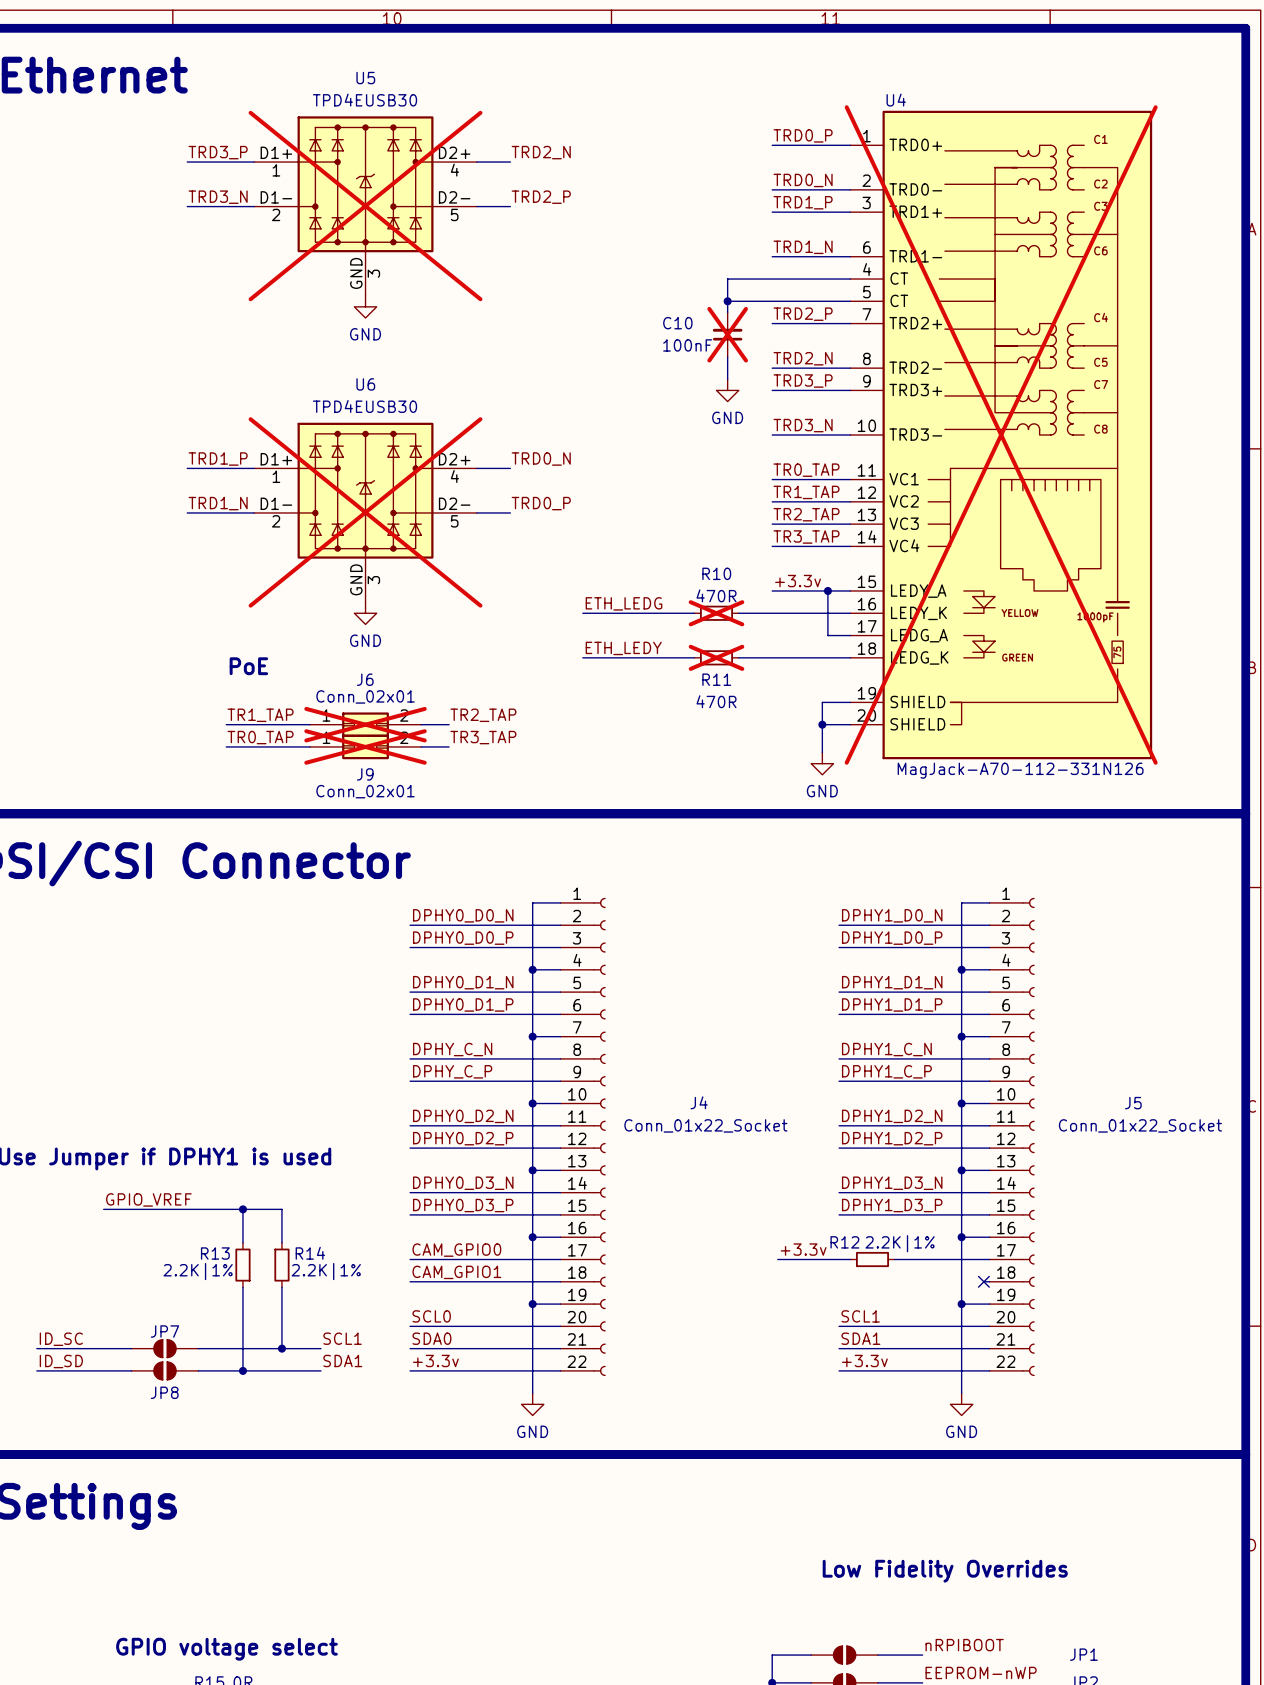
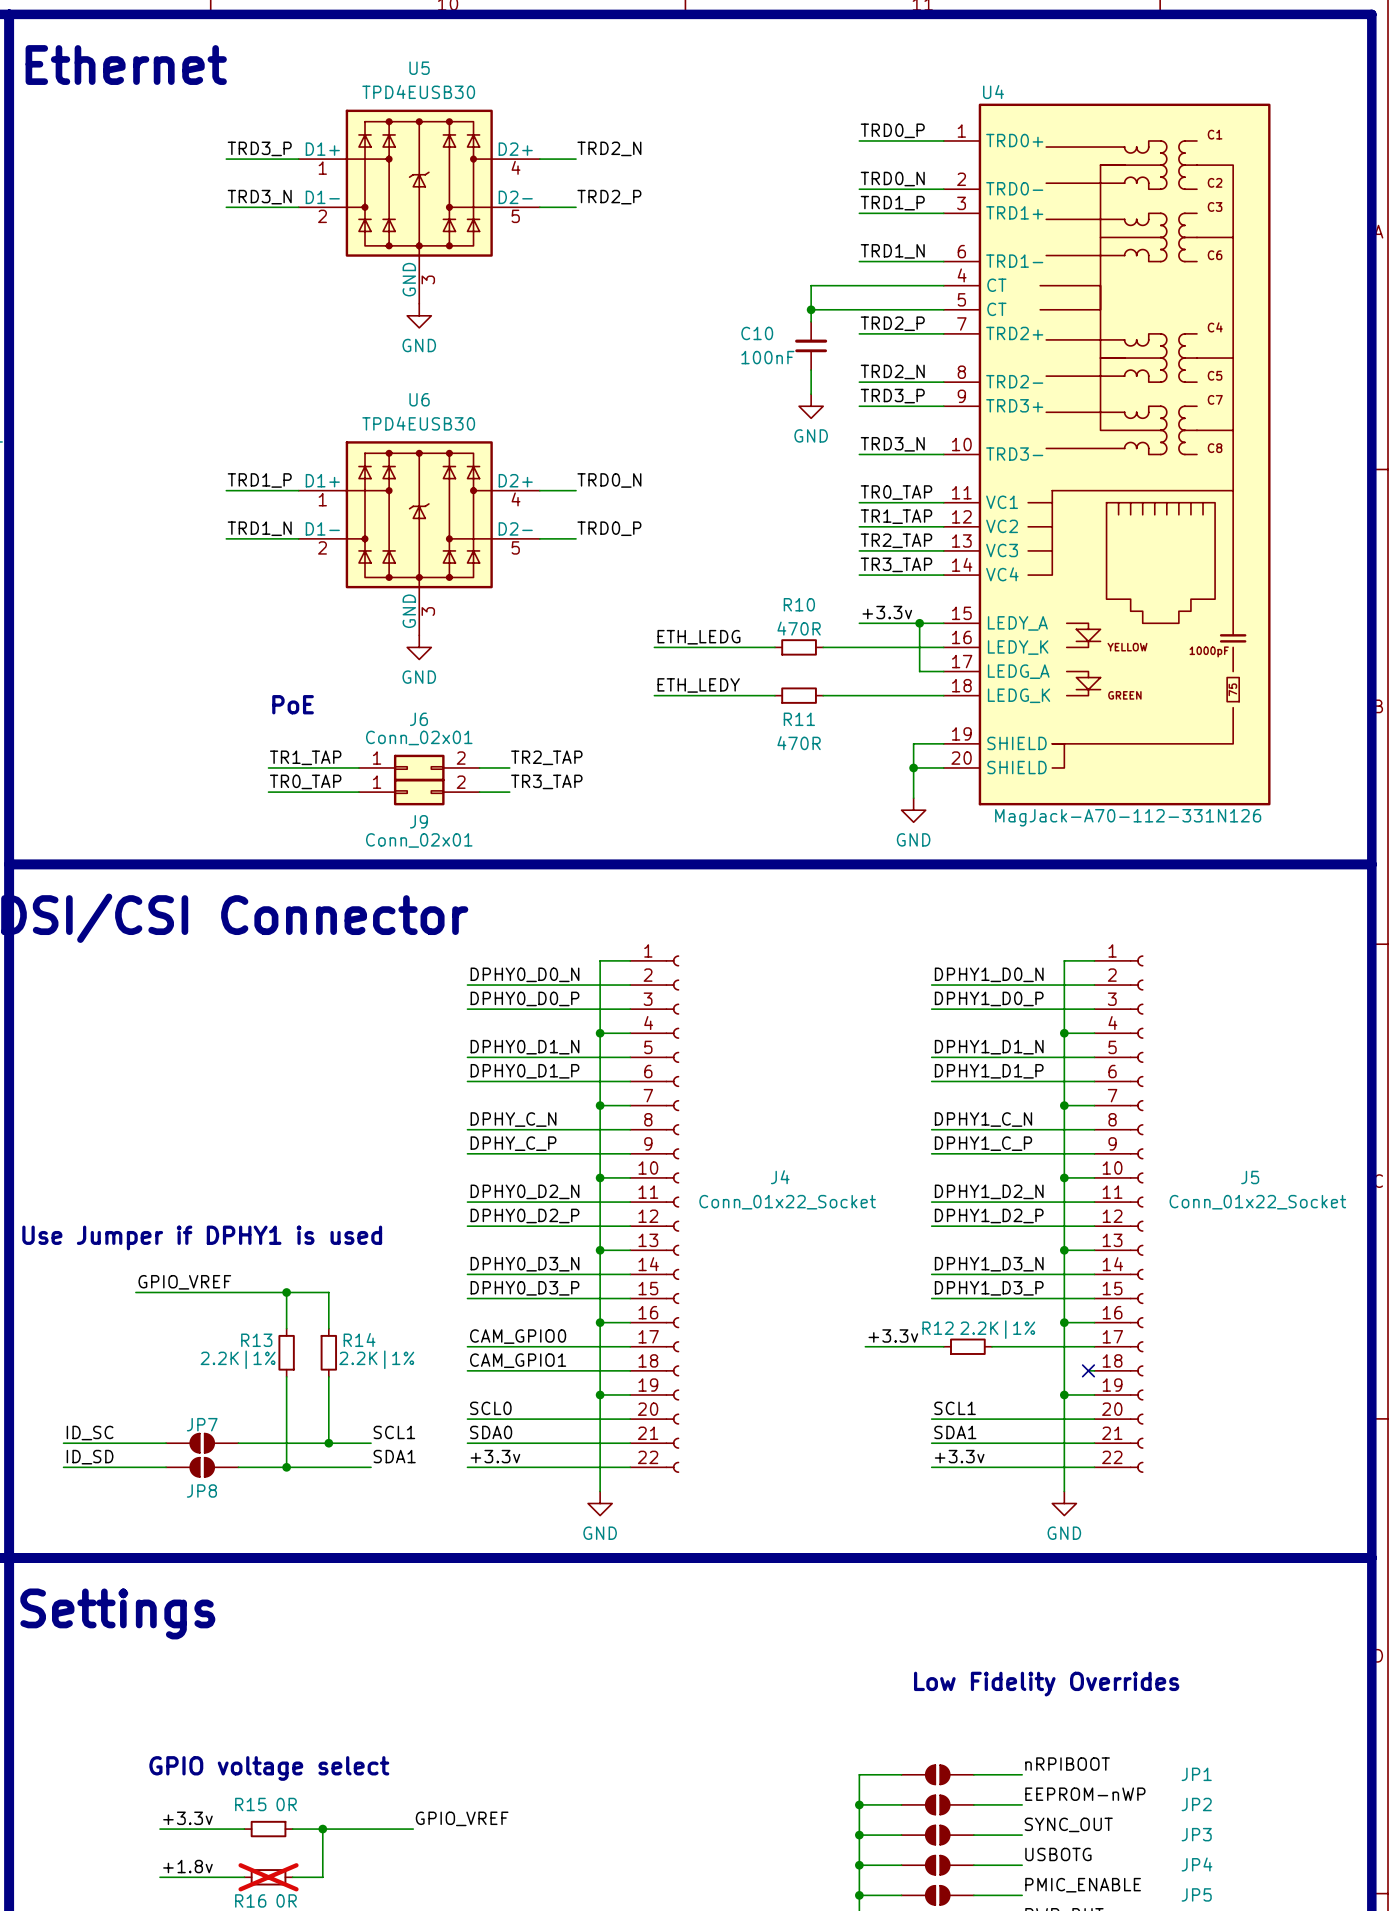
U5 do-not-place cross: (365, 206) -> none
C10 do-not-place cross: (727, 334) -> none
U4 do-not-place cross: (1001, 434) -> none
U6 do-not-place cross: (365, 512) -> none
R10 do-not-place cross: (716, 613) -> none
R11 do-not-place cross: (716, 657) -> none
J6 do-not-place cross: (365, 724) -> none
J9 do-not-place cross: (365, 746) -> none

